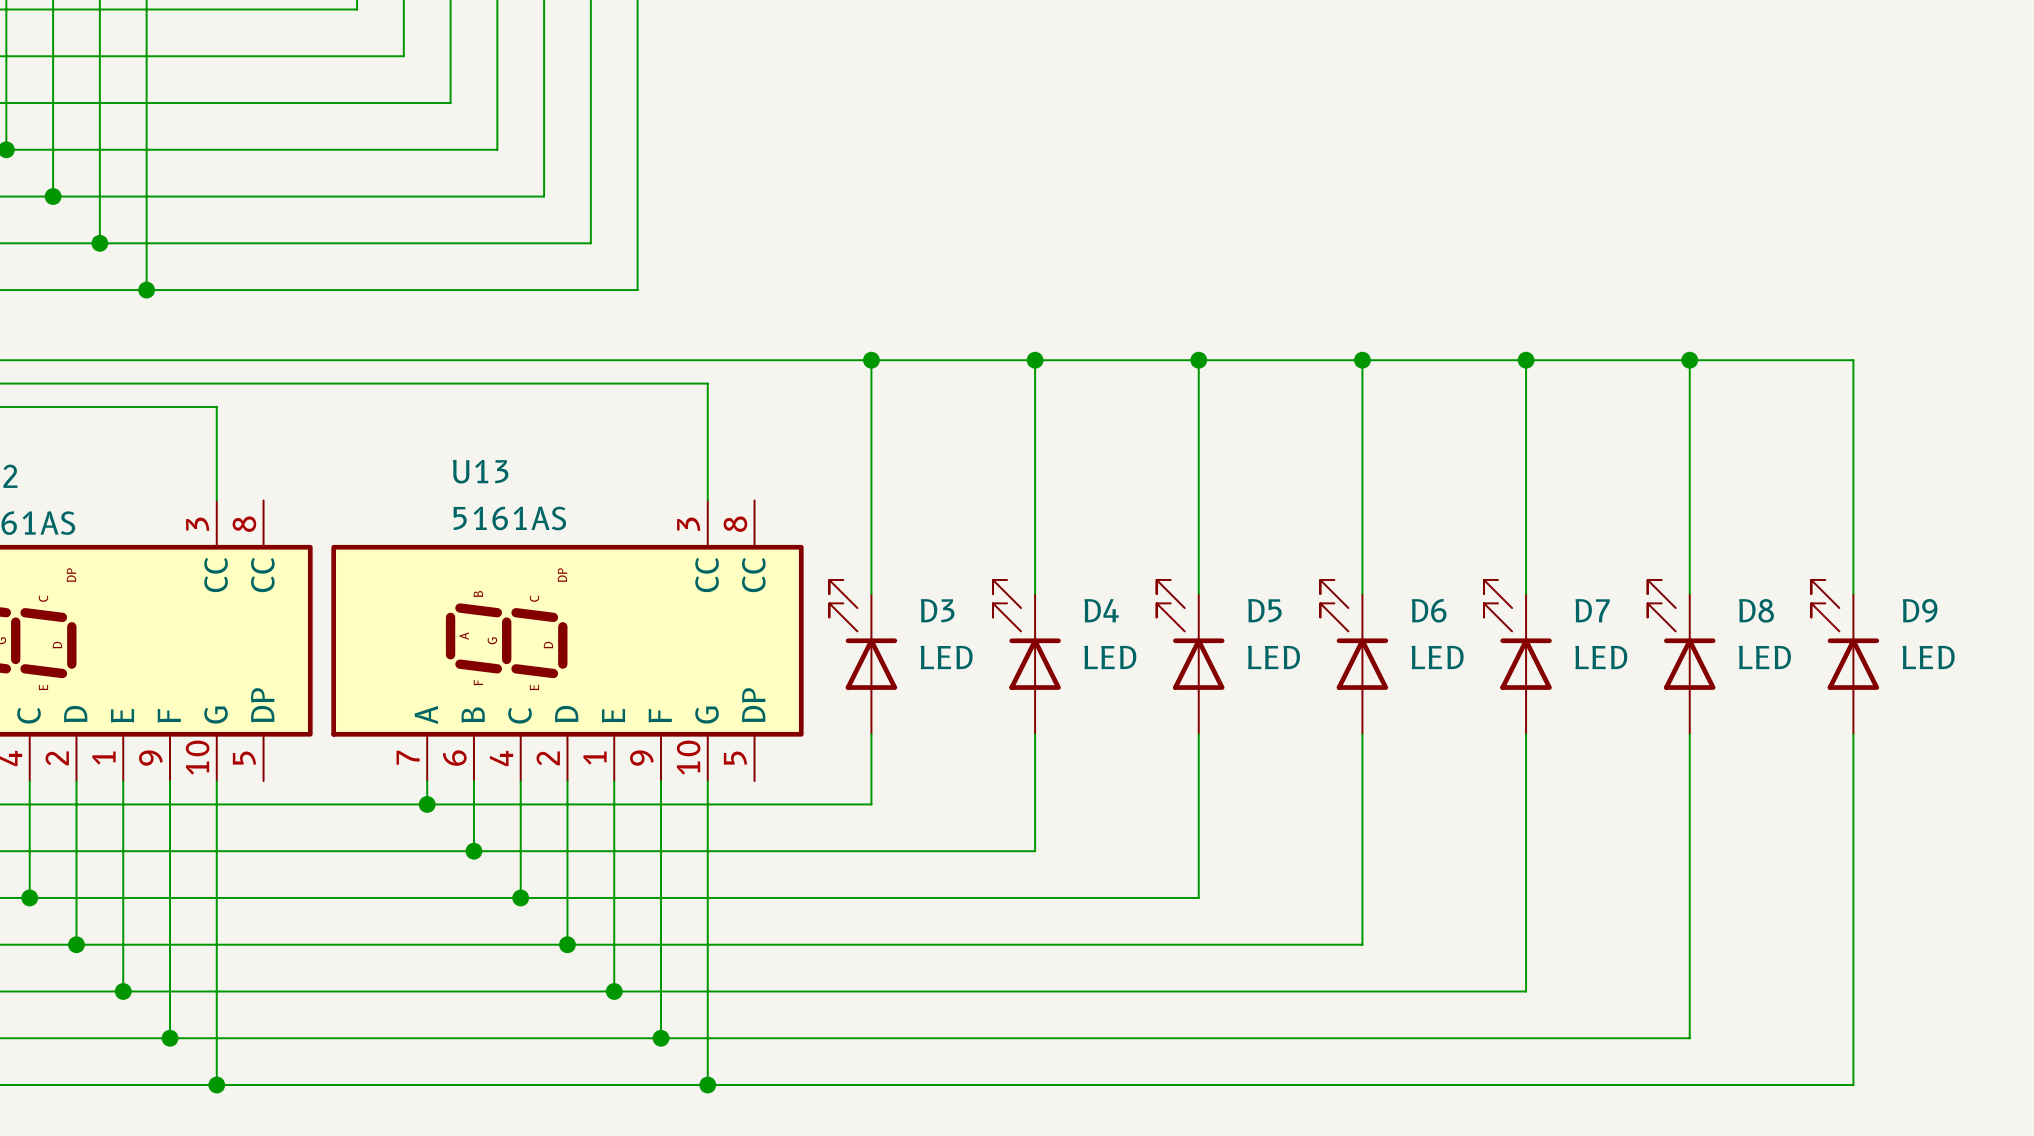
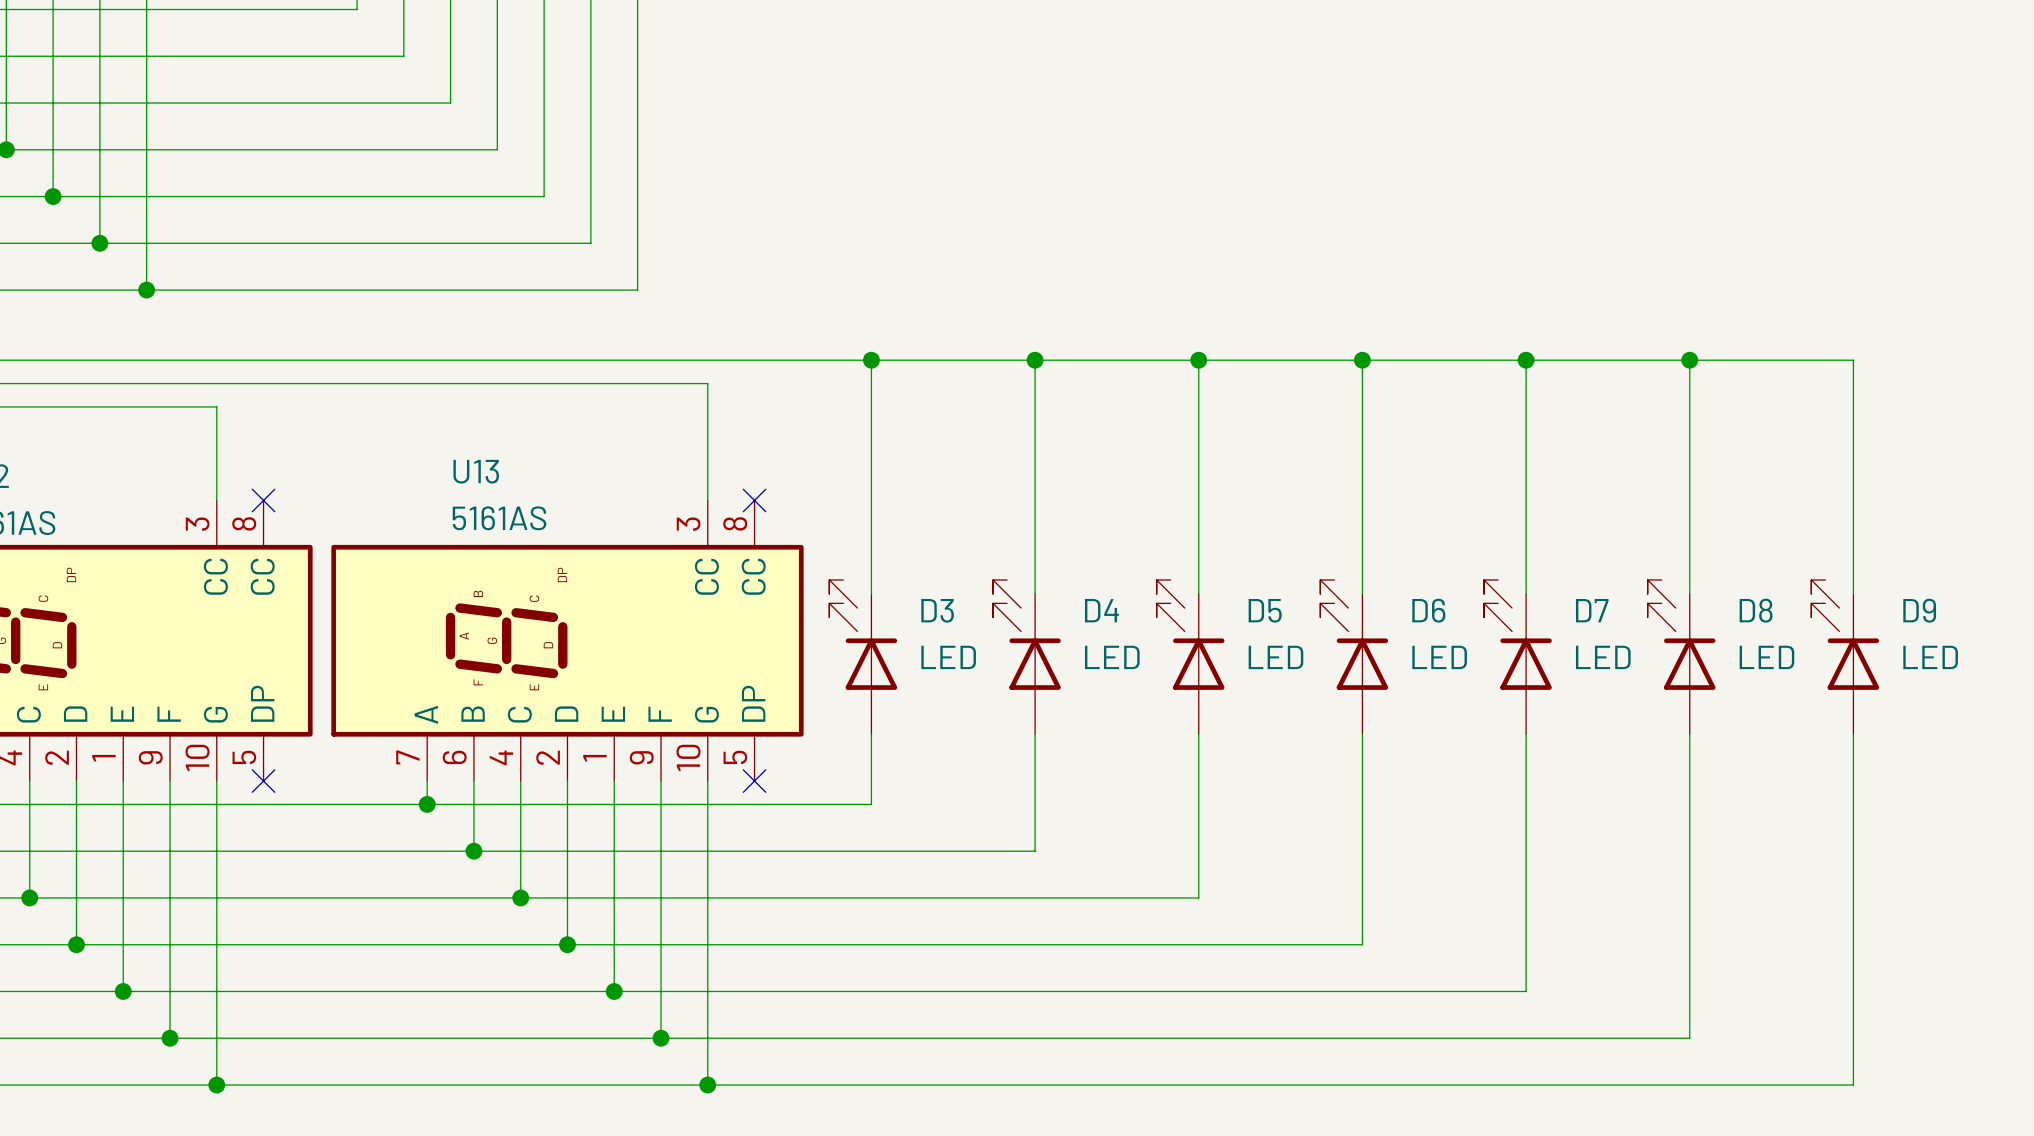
no-connect mark: none -> (263, 500)
no-connect mark: none -> (754, 500)
no-connect mark: none -> (263, 781)
no-connect mark: none -> (754, 781)

